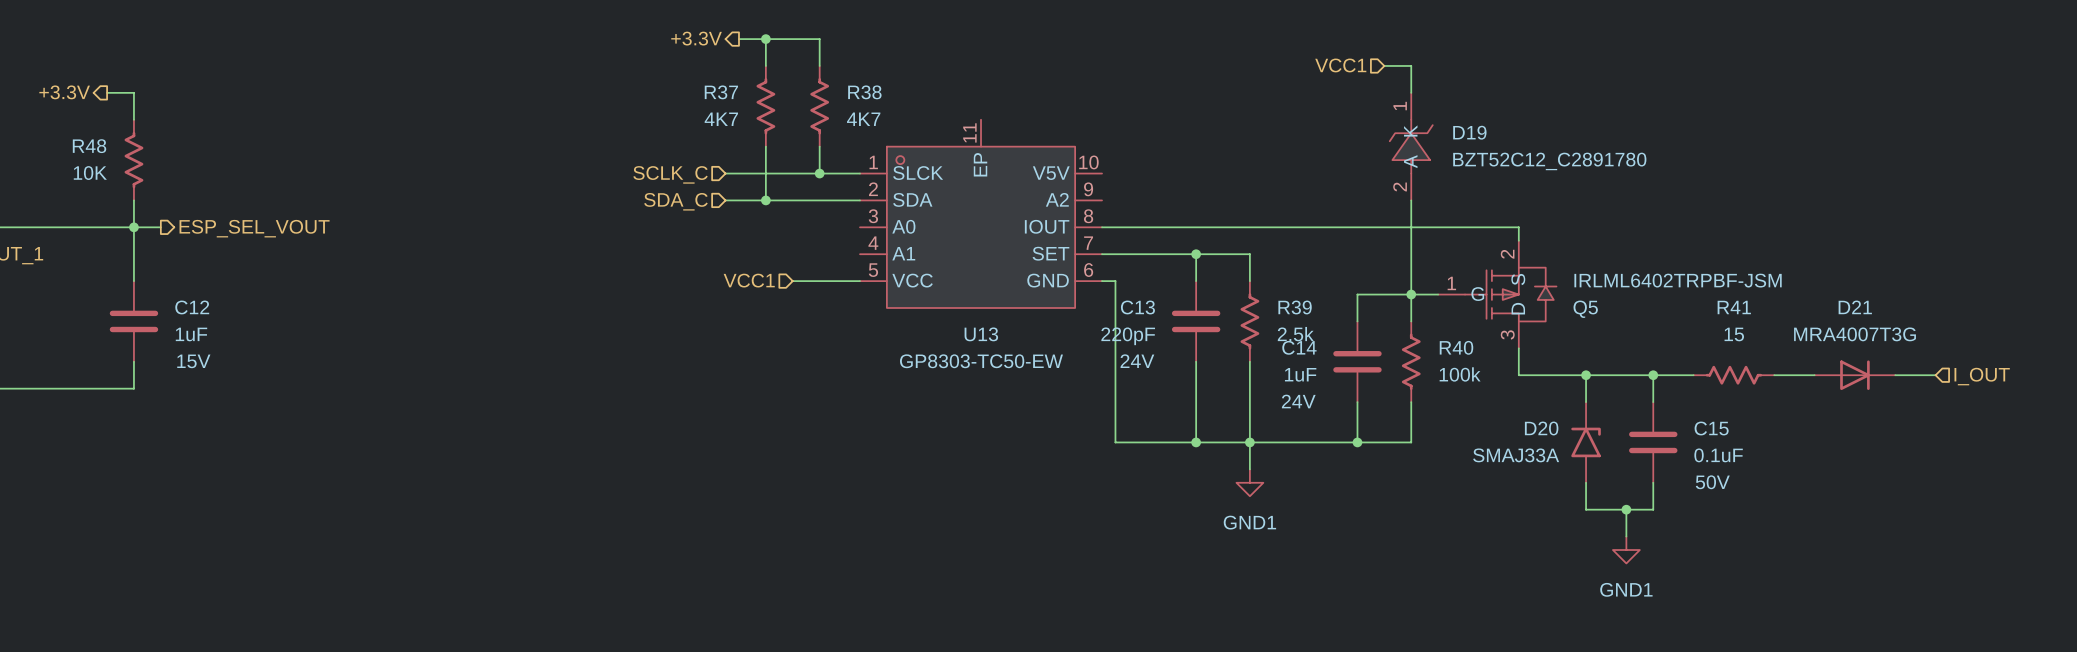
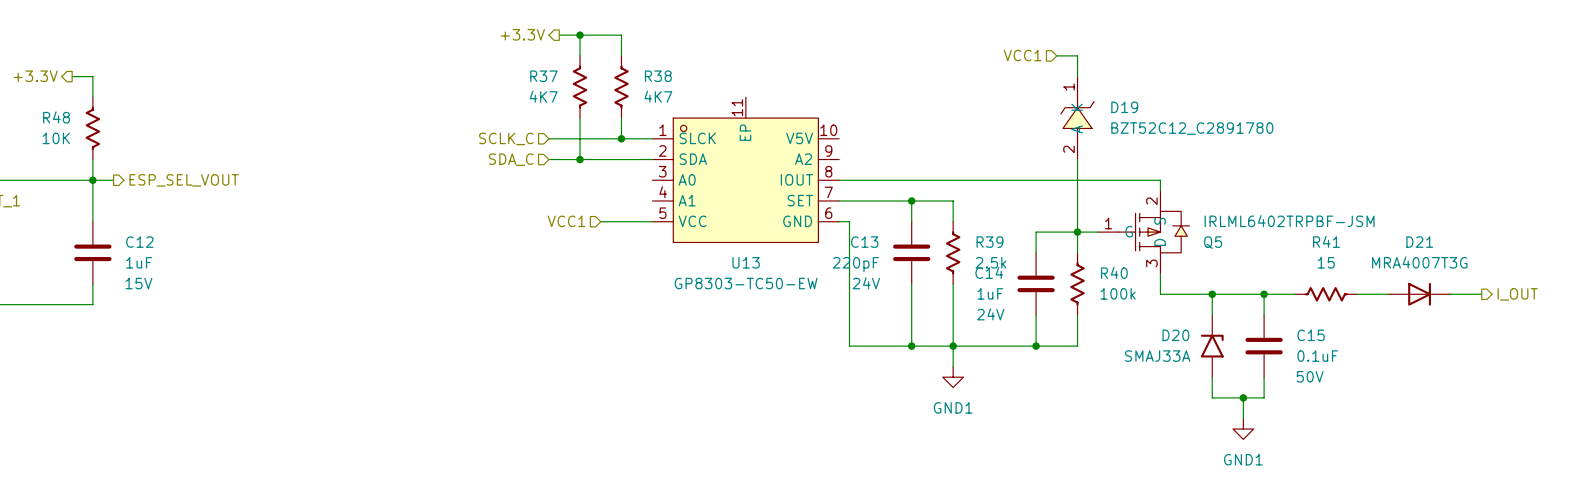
hierarchical label shape: input (1982, 376) -> output (1517, 294)

